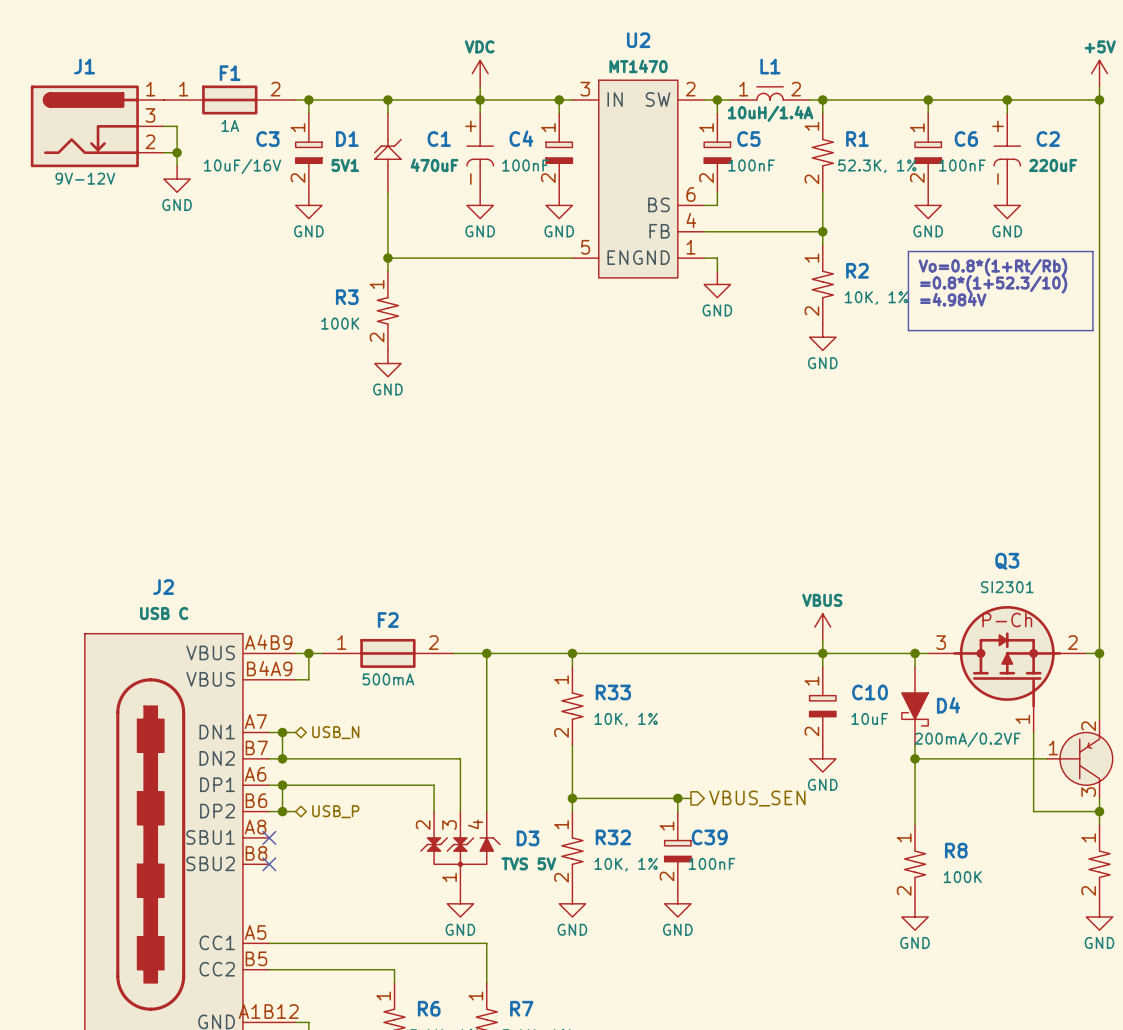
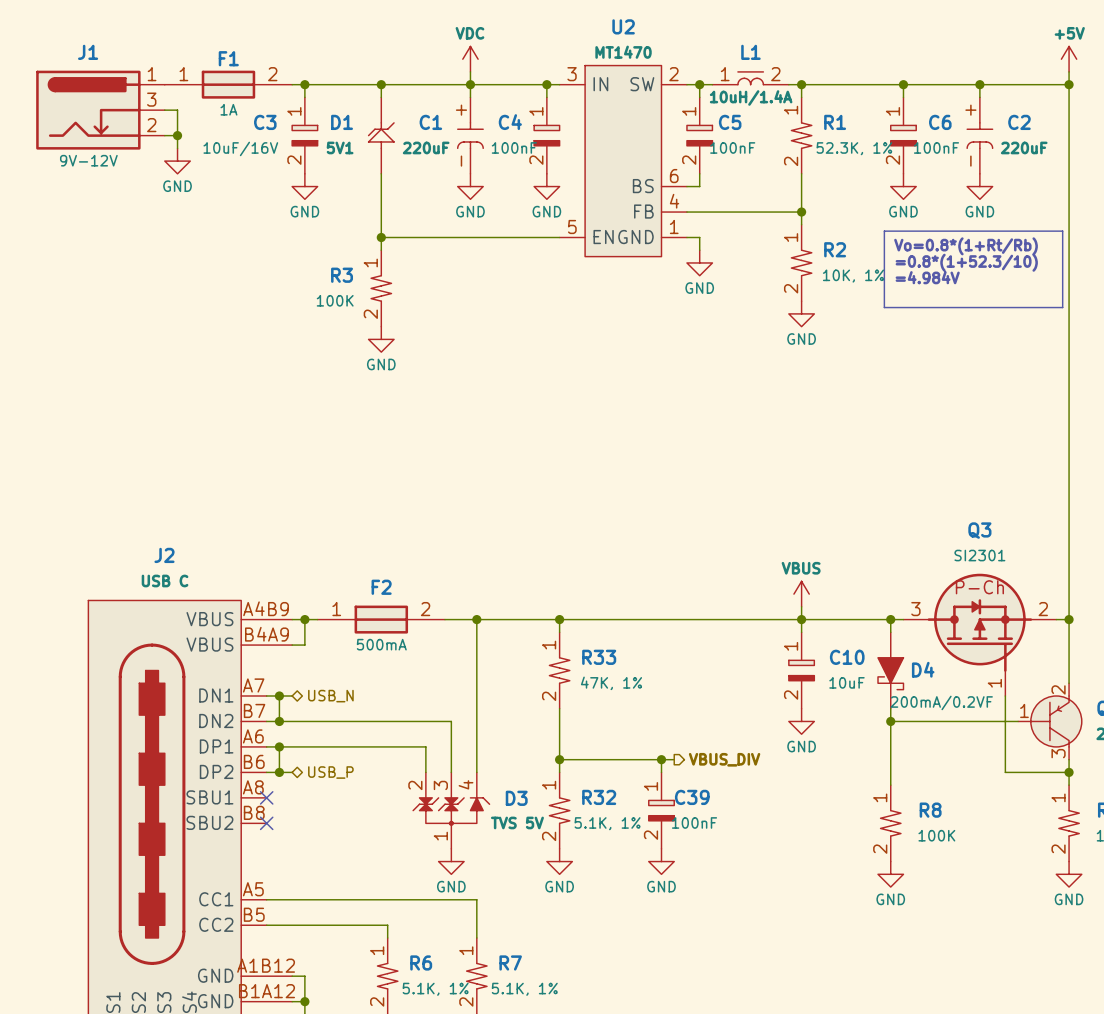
C1 value: 470uF (434, 165) -> 220uF (426, 147)
R33 value: 10K, 1% (626, 719) -> 47K, 1% (611, 683)
hierarchical label: VBUS_SEN (757, 798) -> VBUS_DIV (724, 759)
R32 value: 10K, 1% (626, 864) -> 5.1K, 1% (607, 823)

